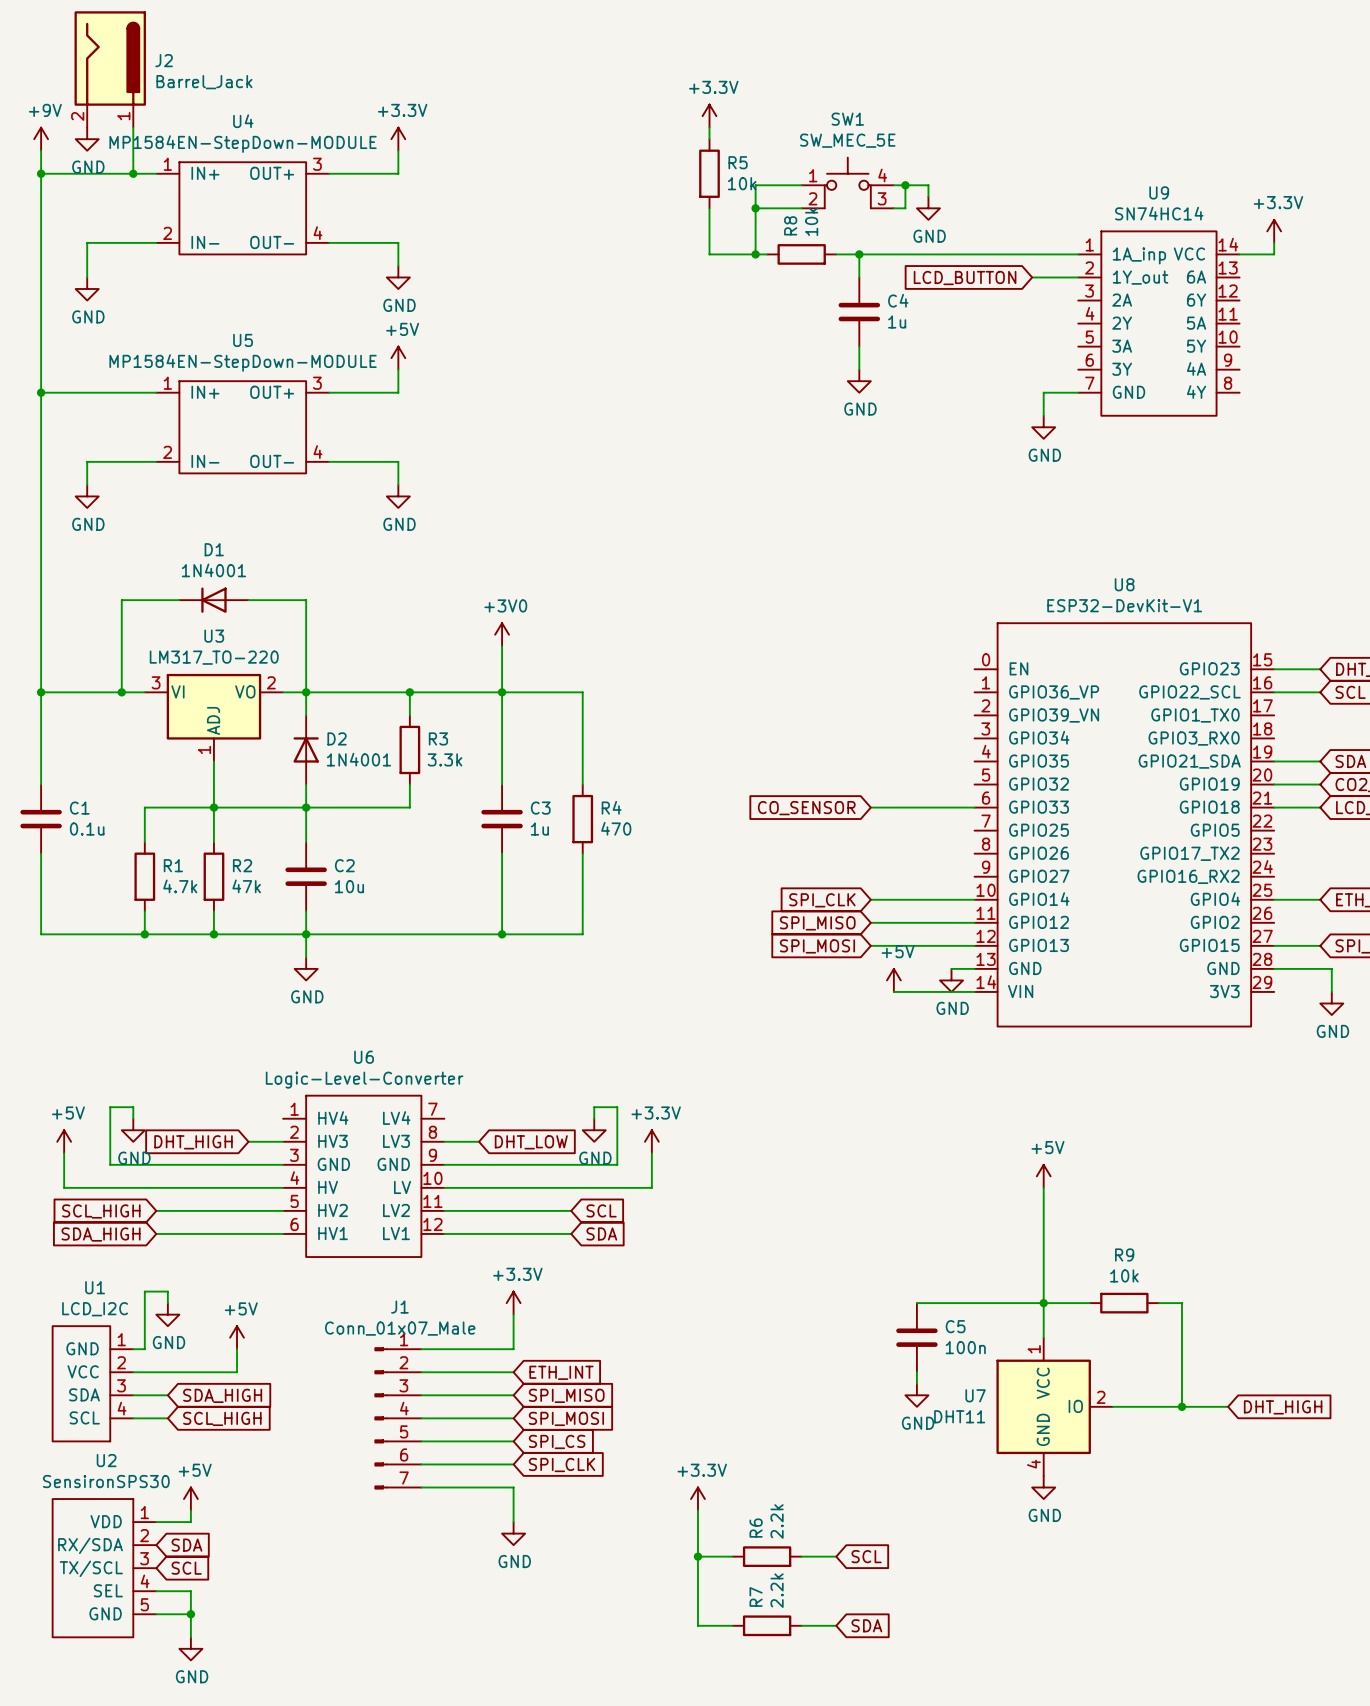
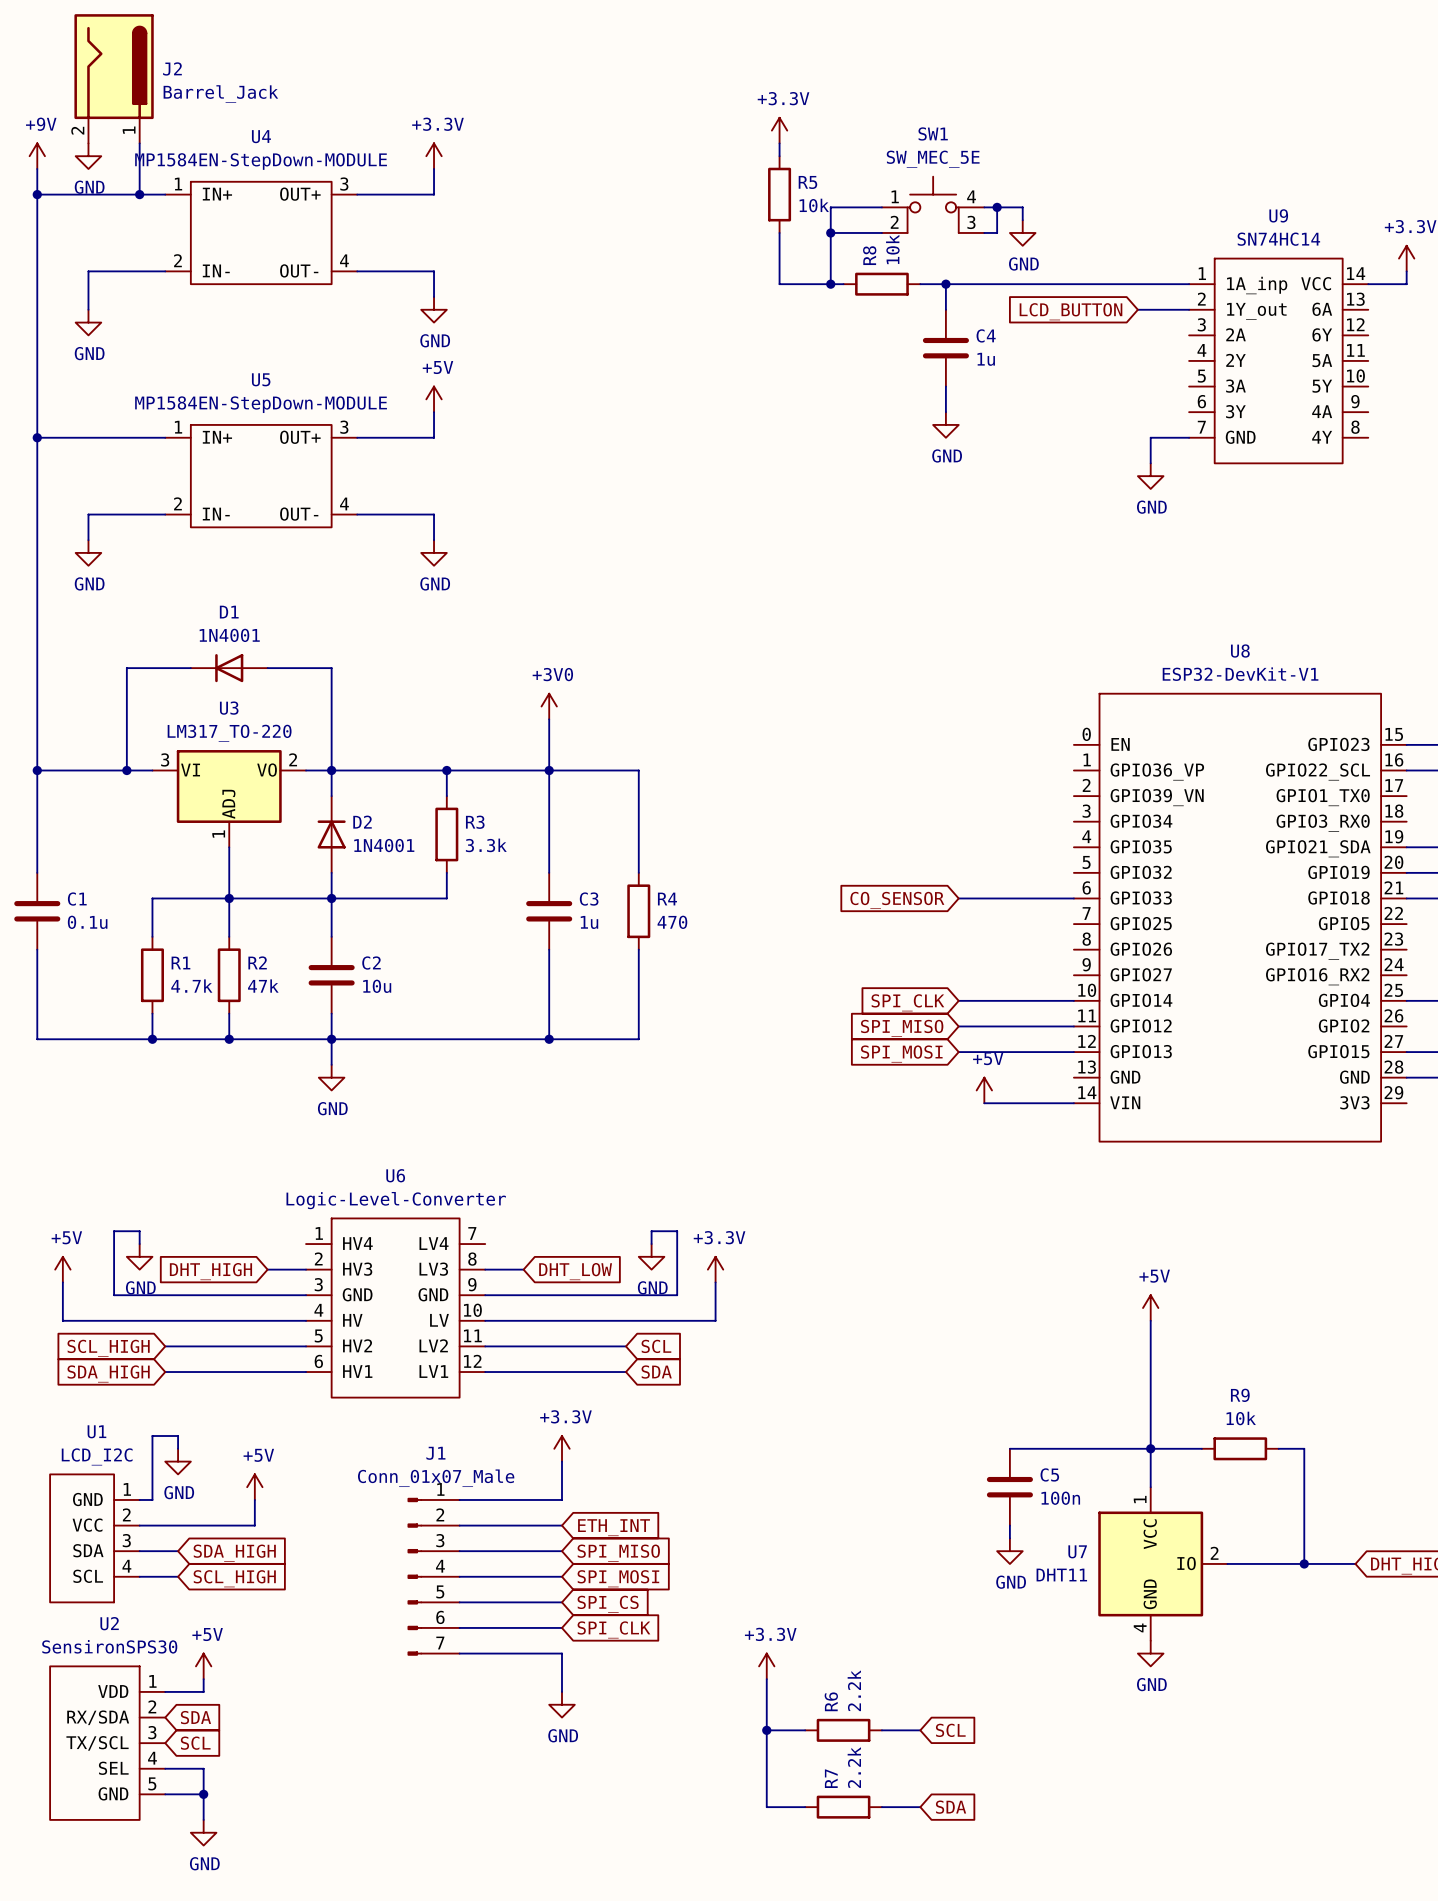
wire: (951, 968) (974, 968) -> none
power symbol: GND (951, 980) -> none

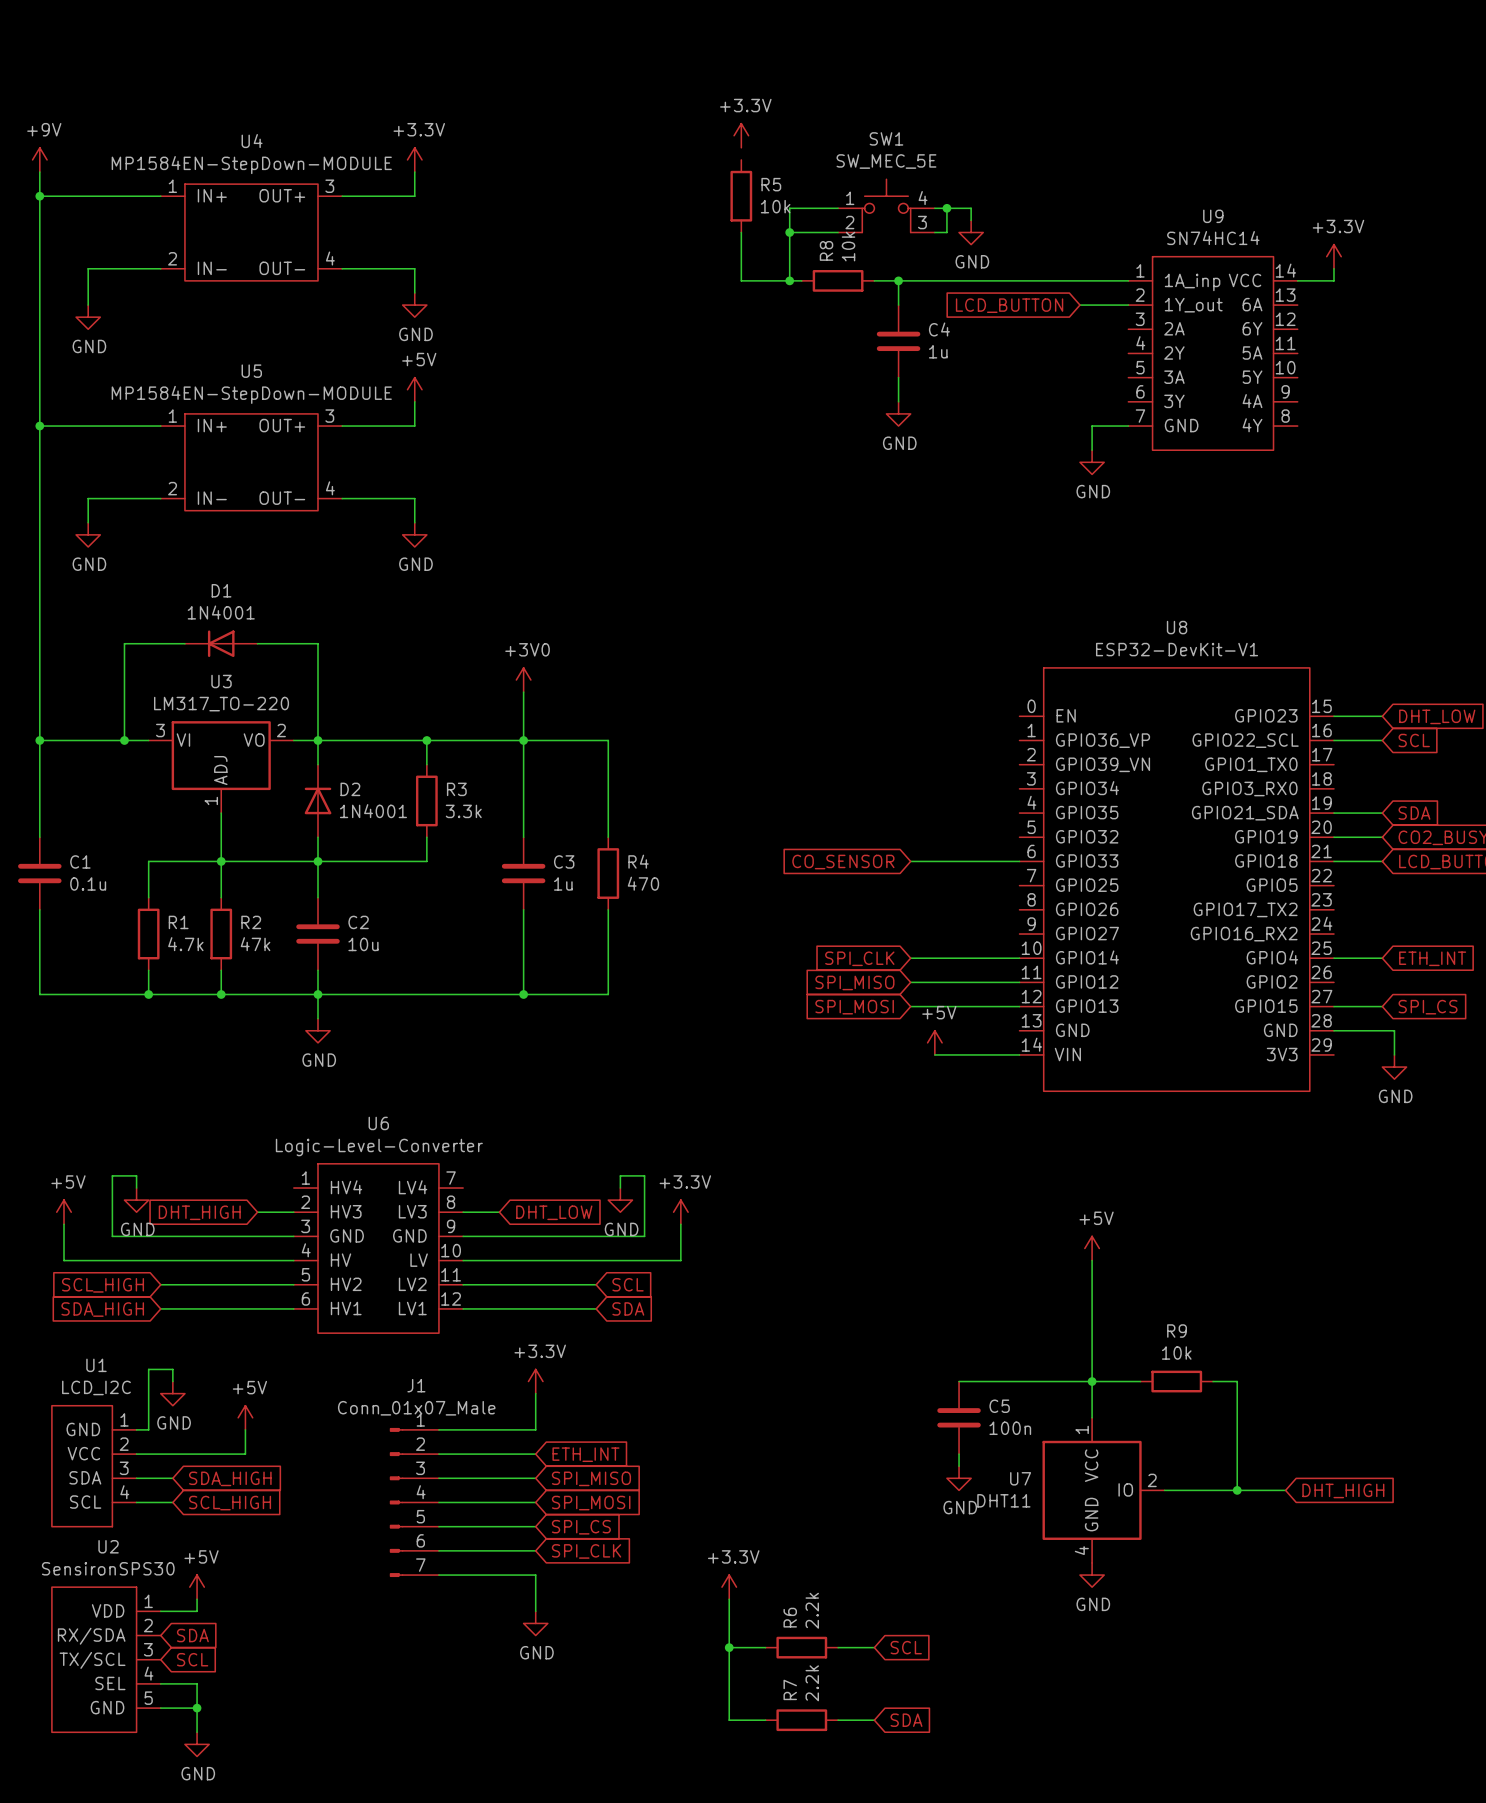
J2: Barrel_Jack (114, 78) -> none
wire: (139, 143) (139, 194) -> none
wire: (779, 143) (779, 156) -> none
power symbol: GND (88, 156) -> none
junction: (139, 194) -> none

